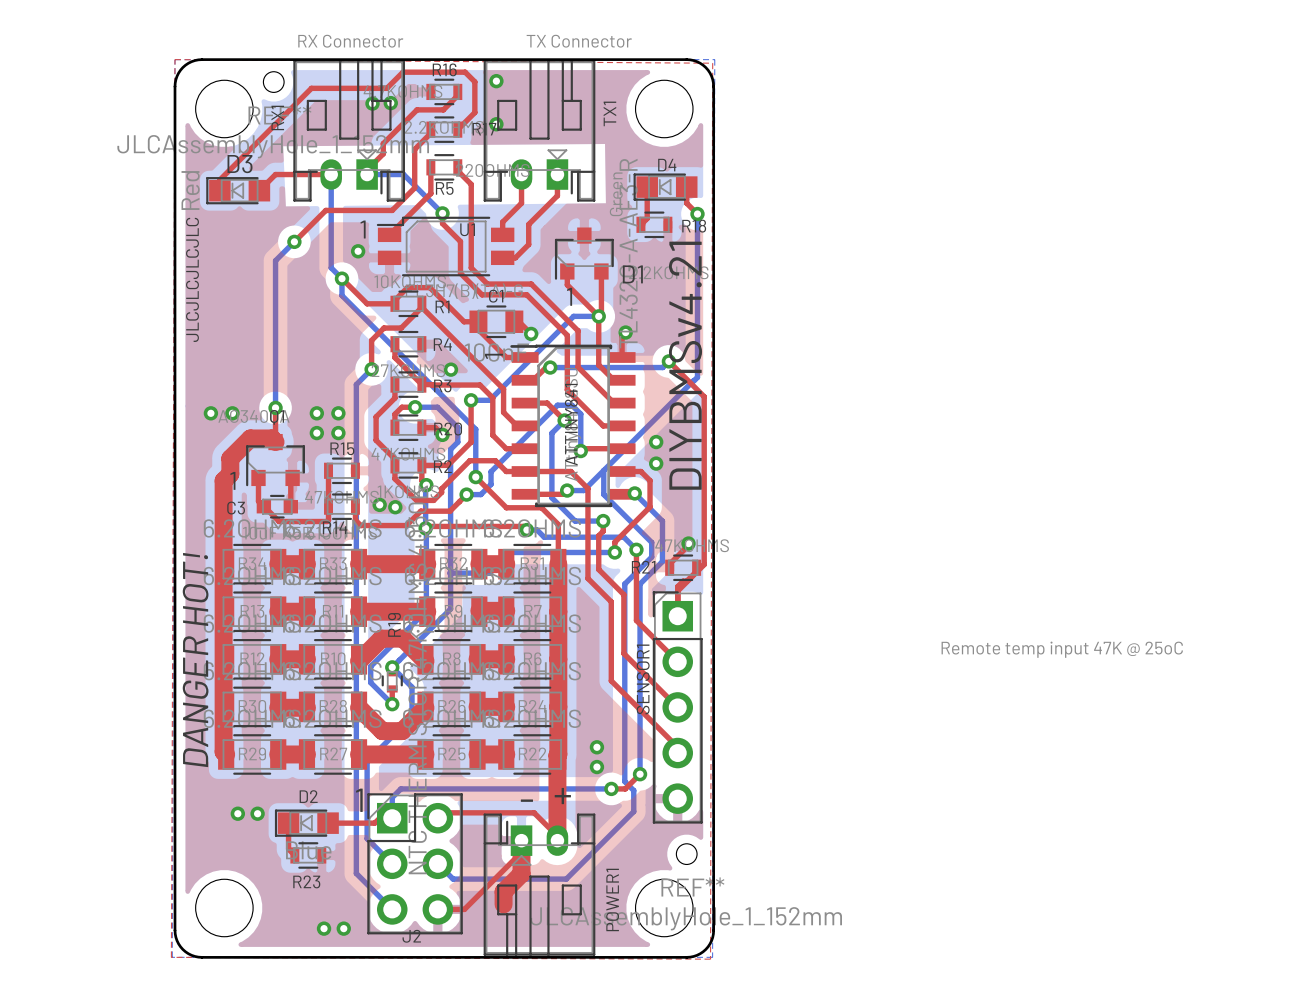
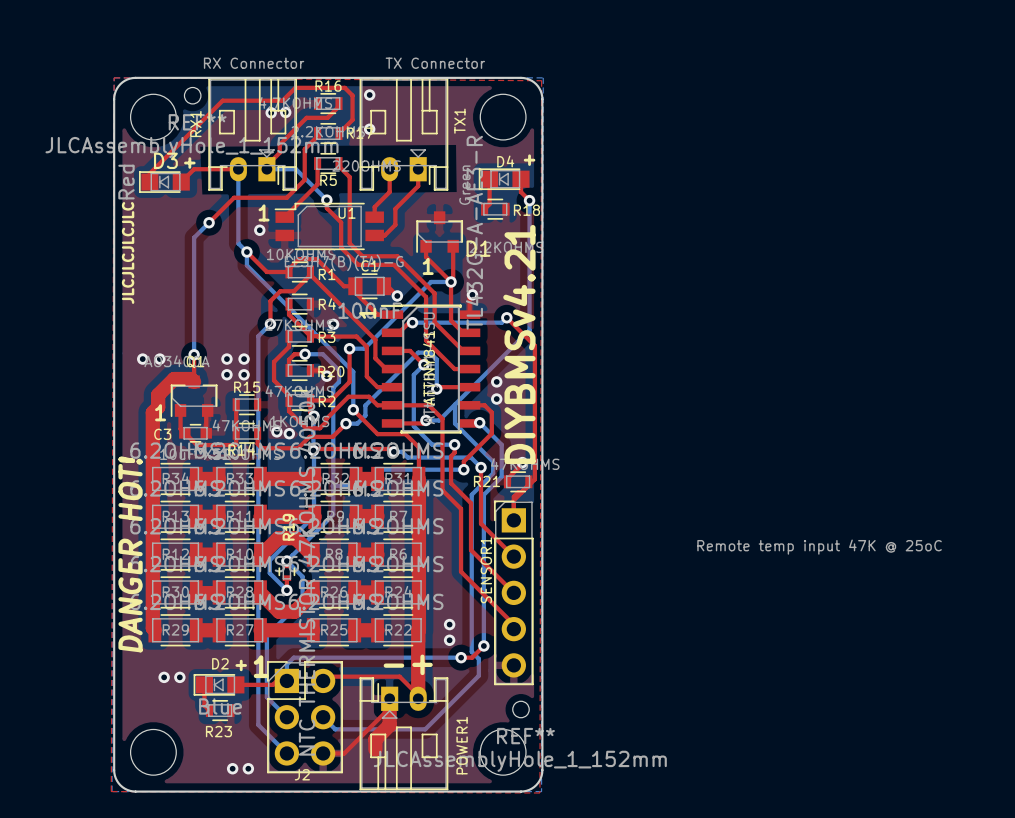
text: none -> + (529, 160)
text: none -> + (189, 163)
text: none -> + (241, 665)

